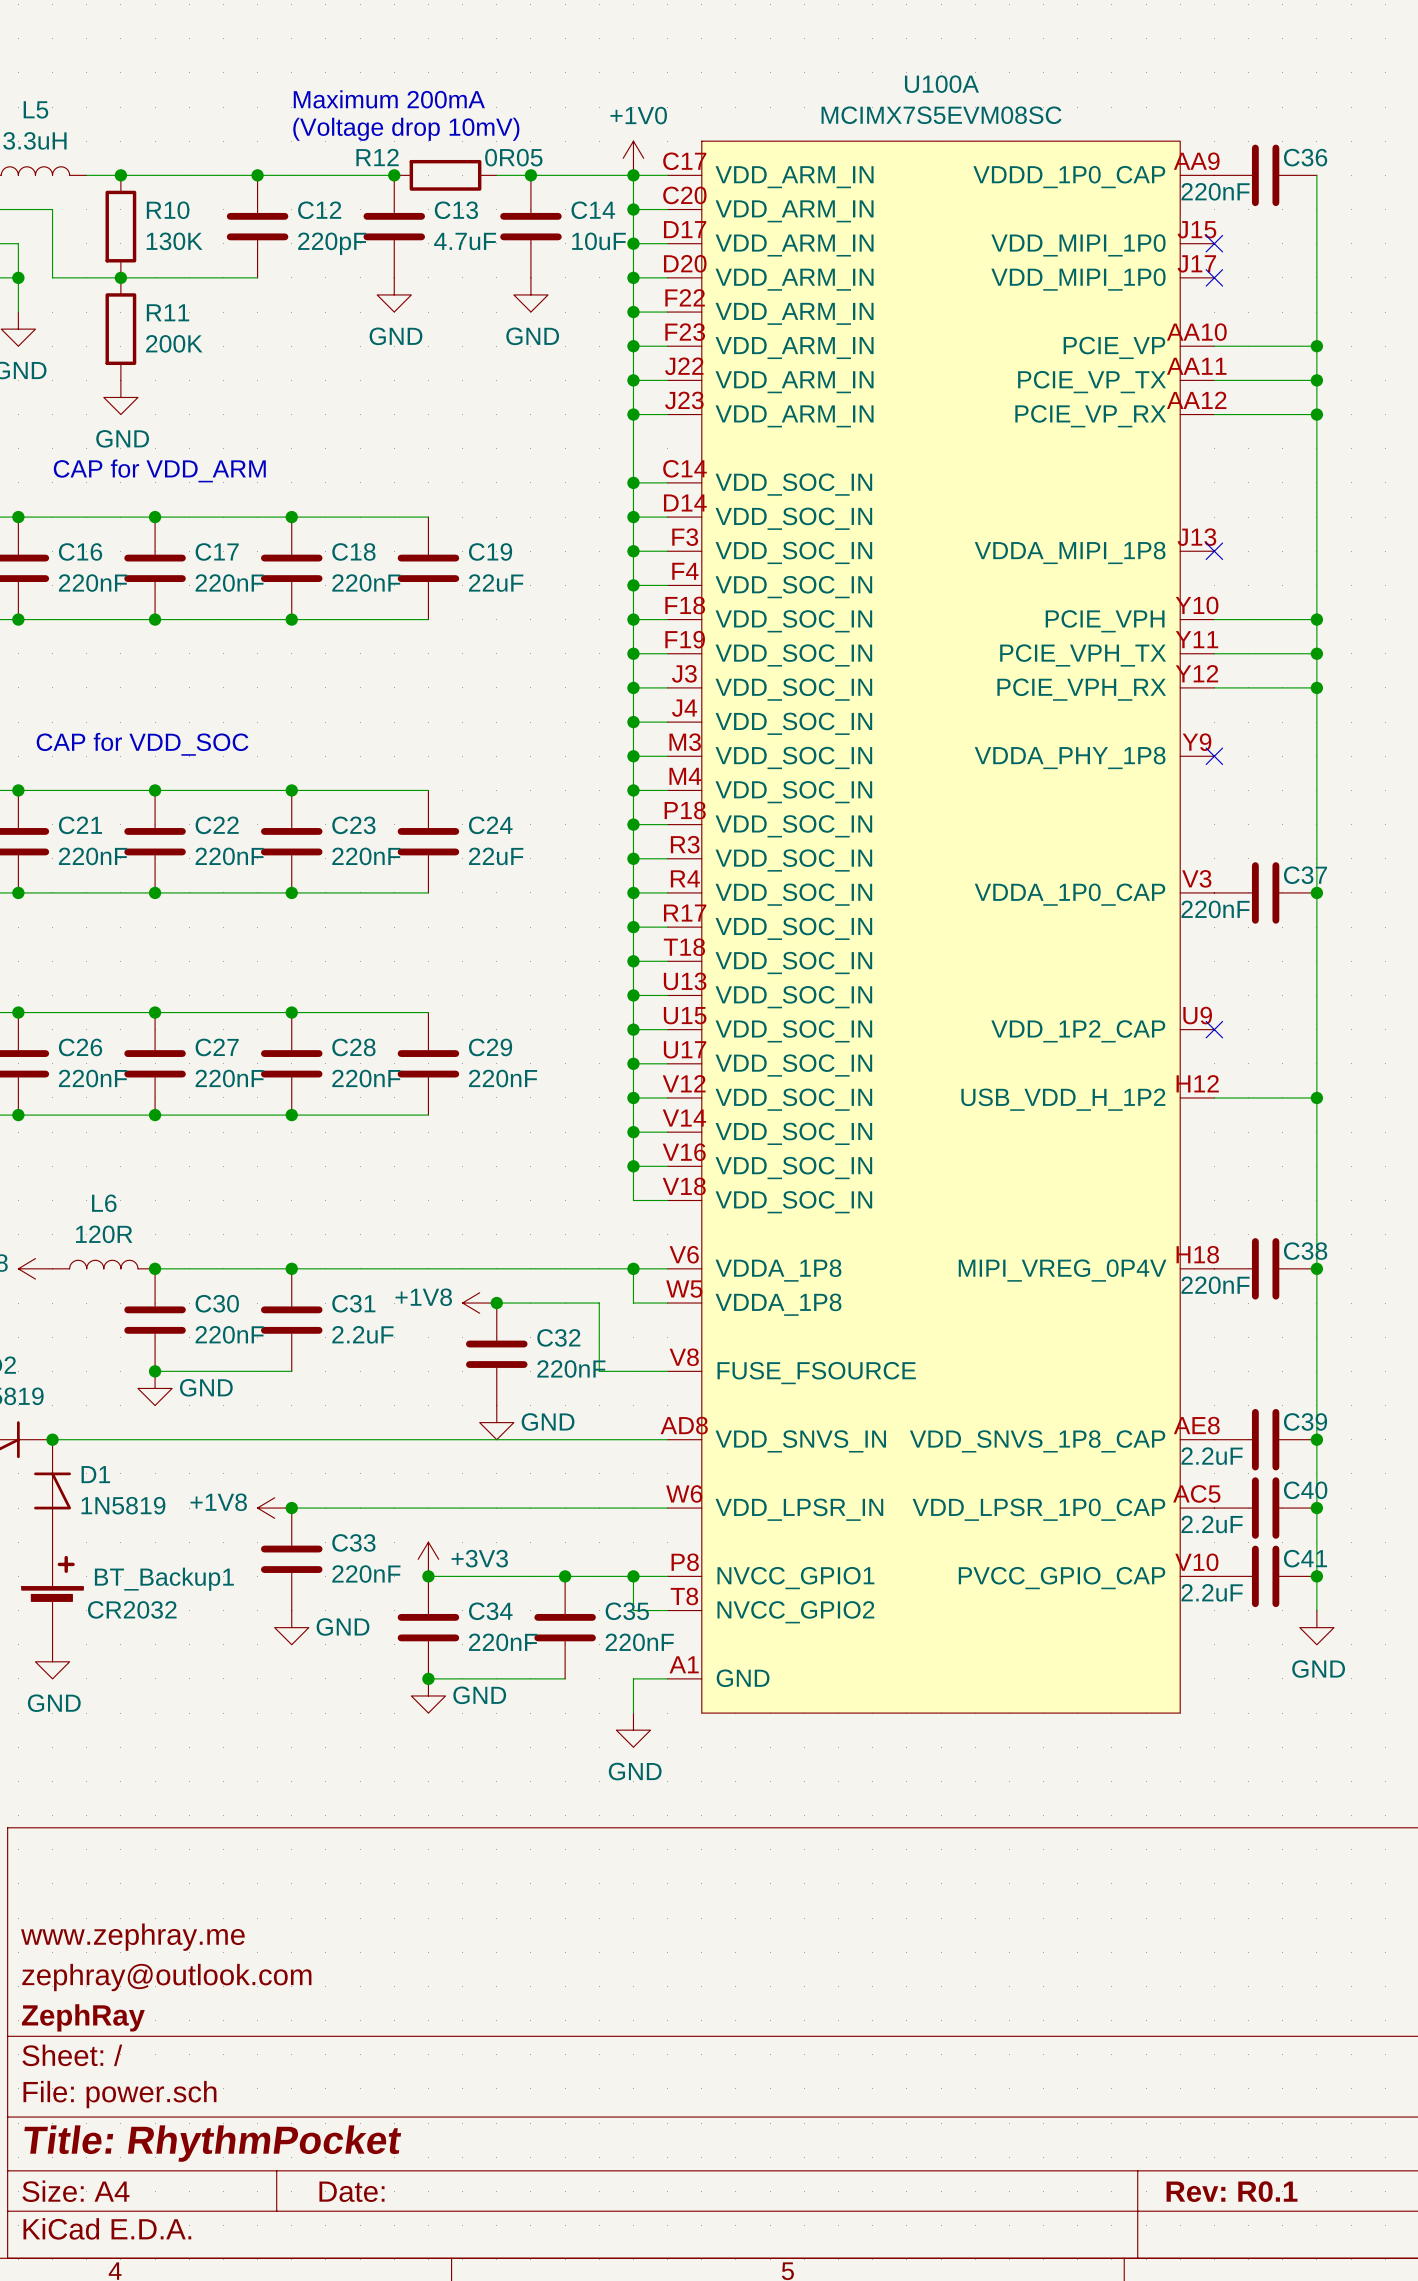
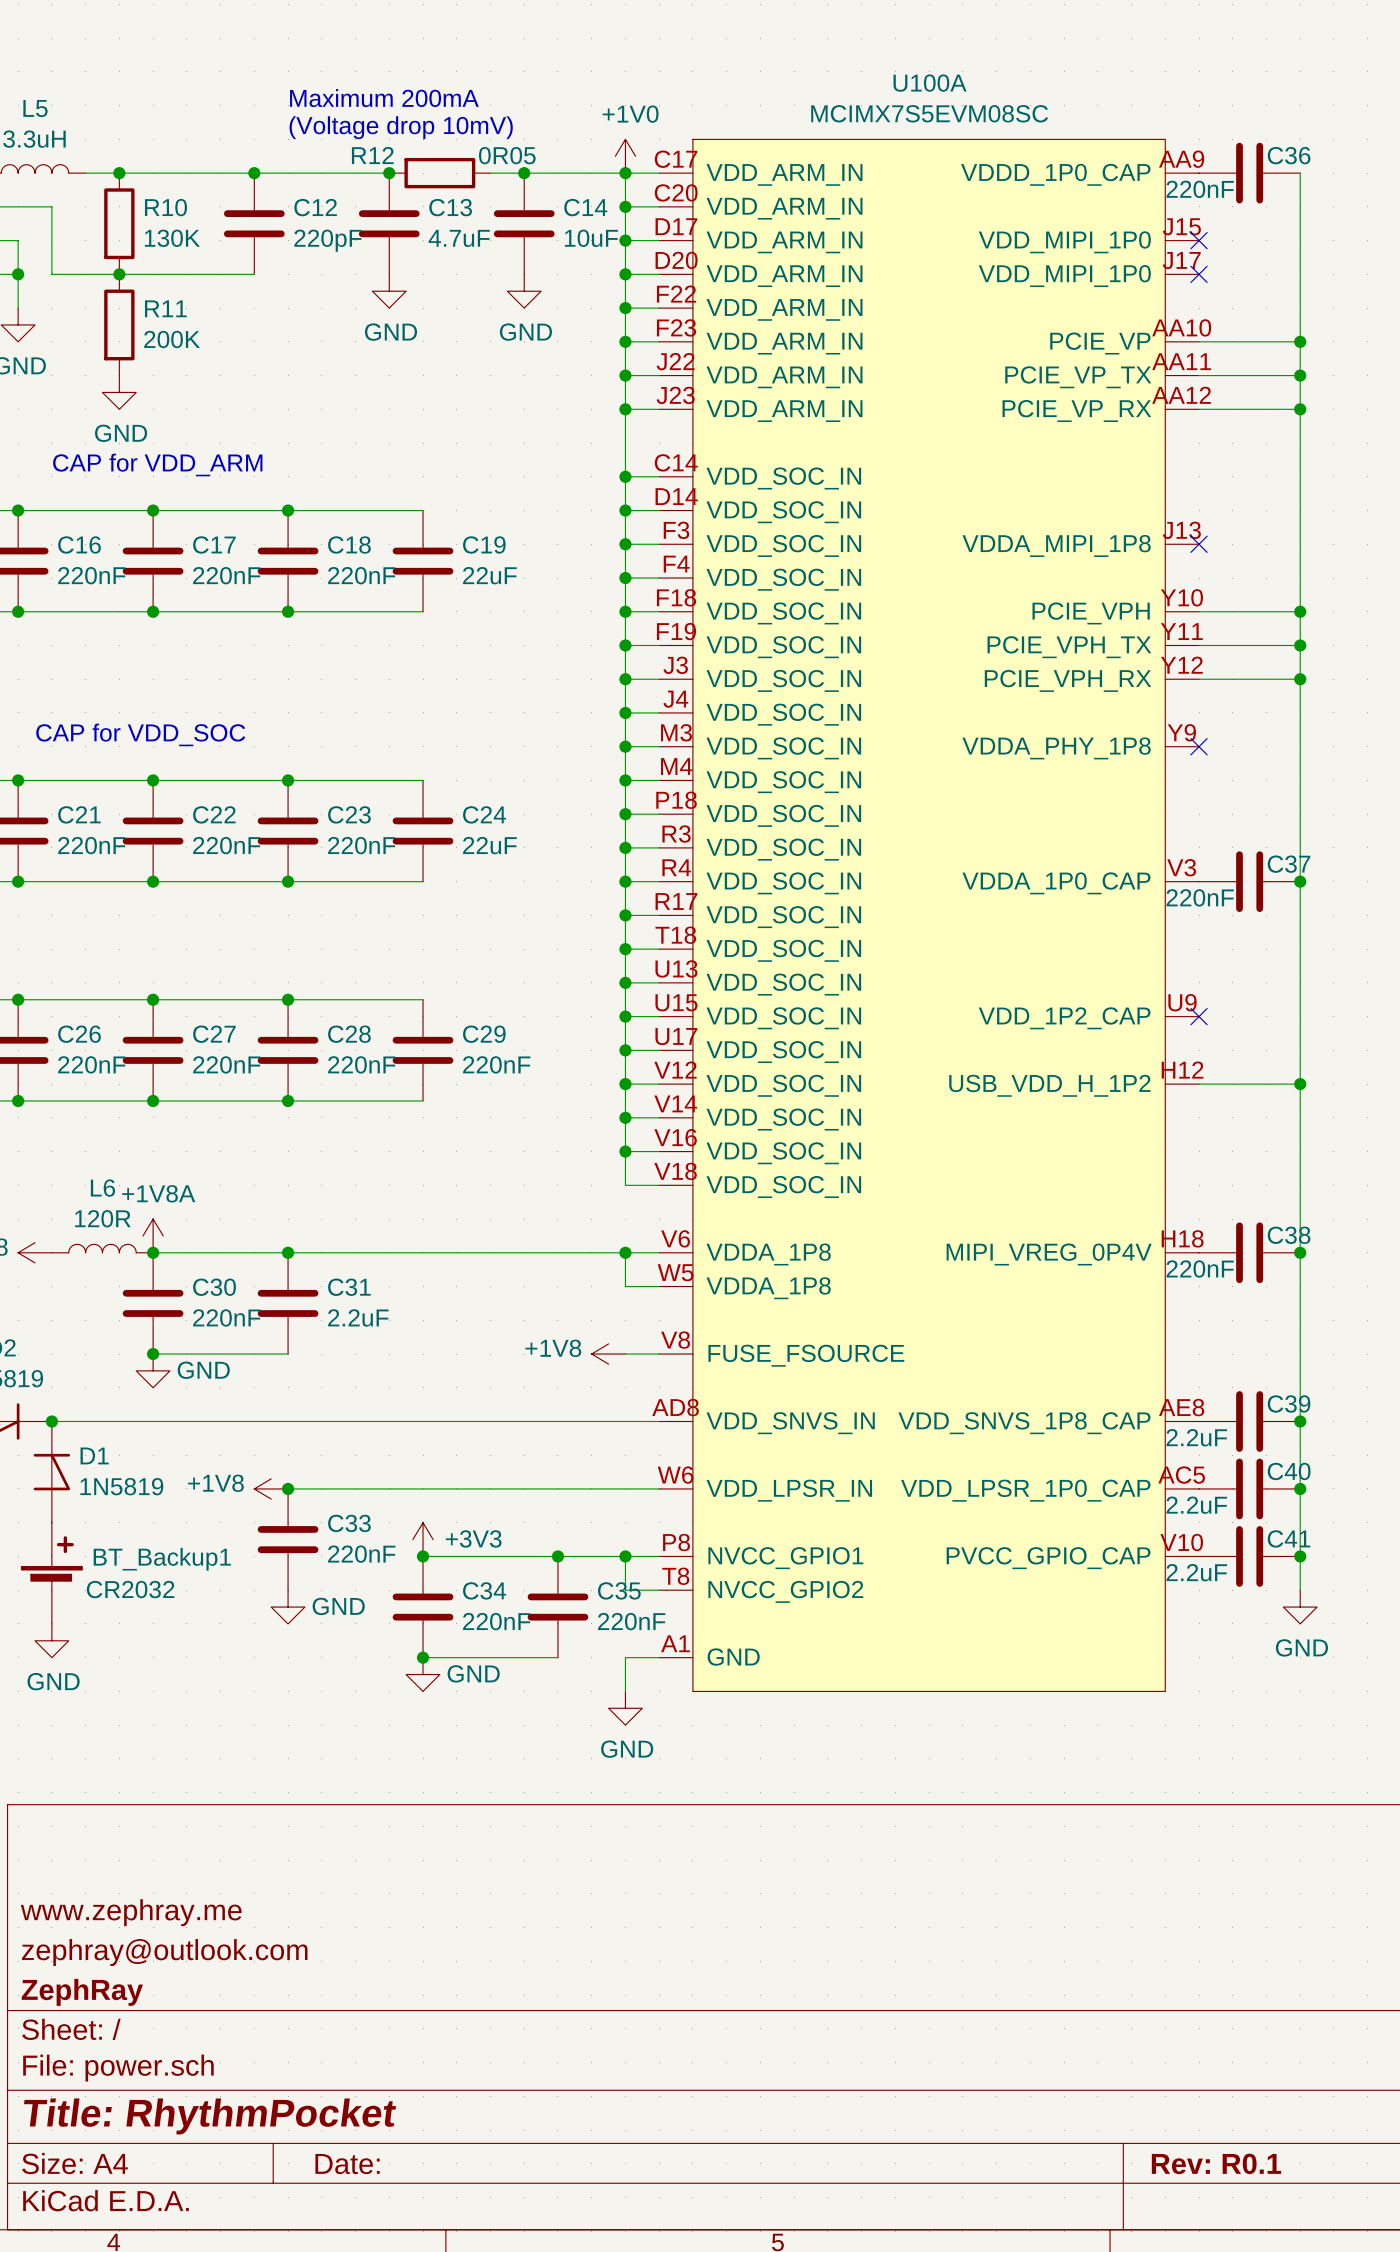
power symbol: none -> +1V8A (153, 1235)
power symbol position: +1V8 (479, 1303) -> +1V8 (608, 1354)
wire: (496, 1303) (599, 1303) (599, 1371) (633, 1371) -> none
junction: (496, 1303) -> none
C32: 220nF (496, 1354) -> none
power symbol: GND (496, 1422) -> none

